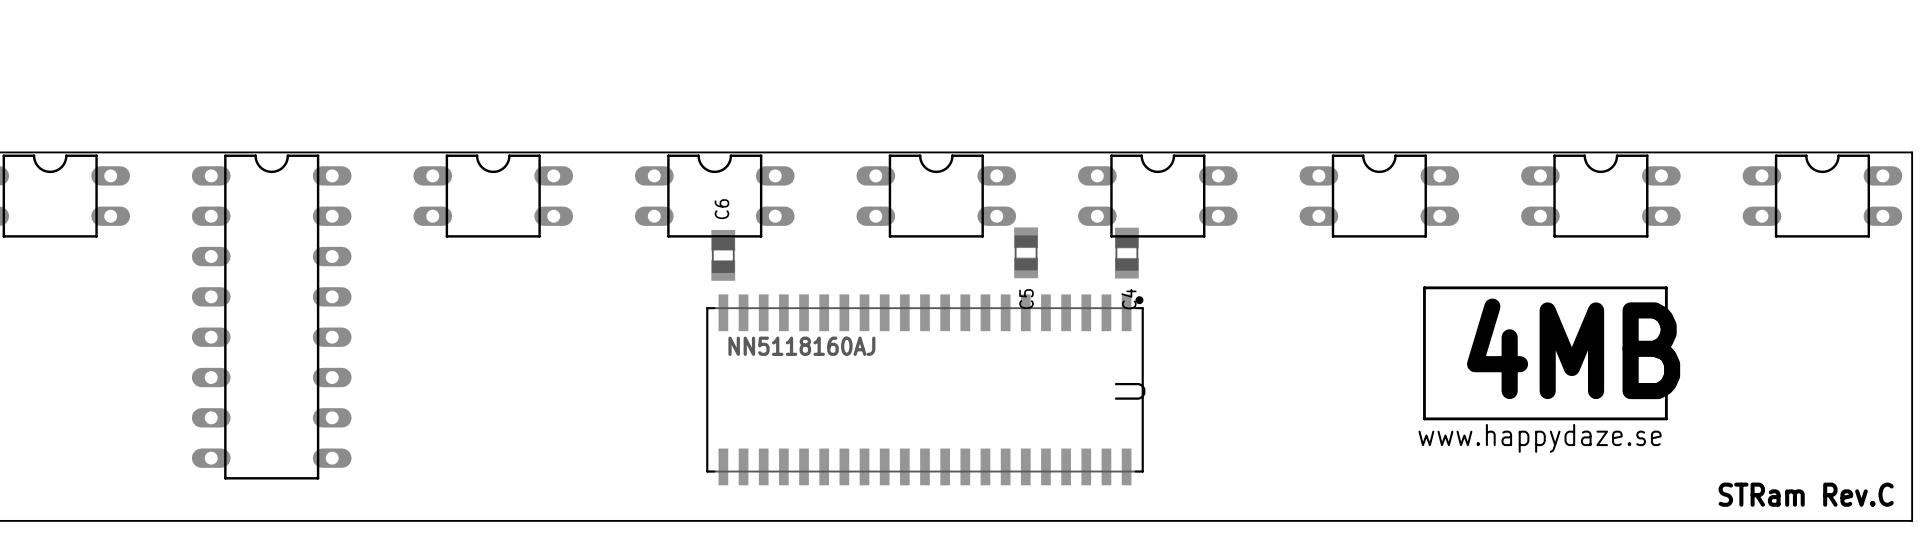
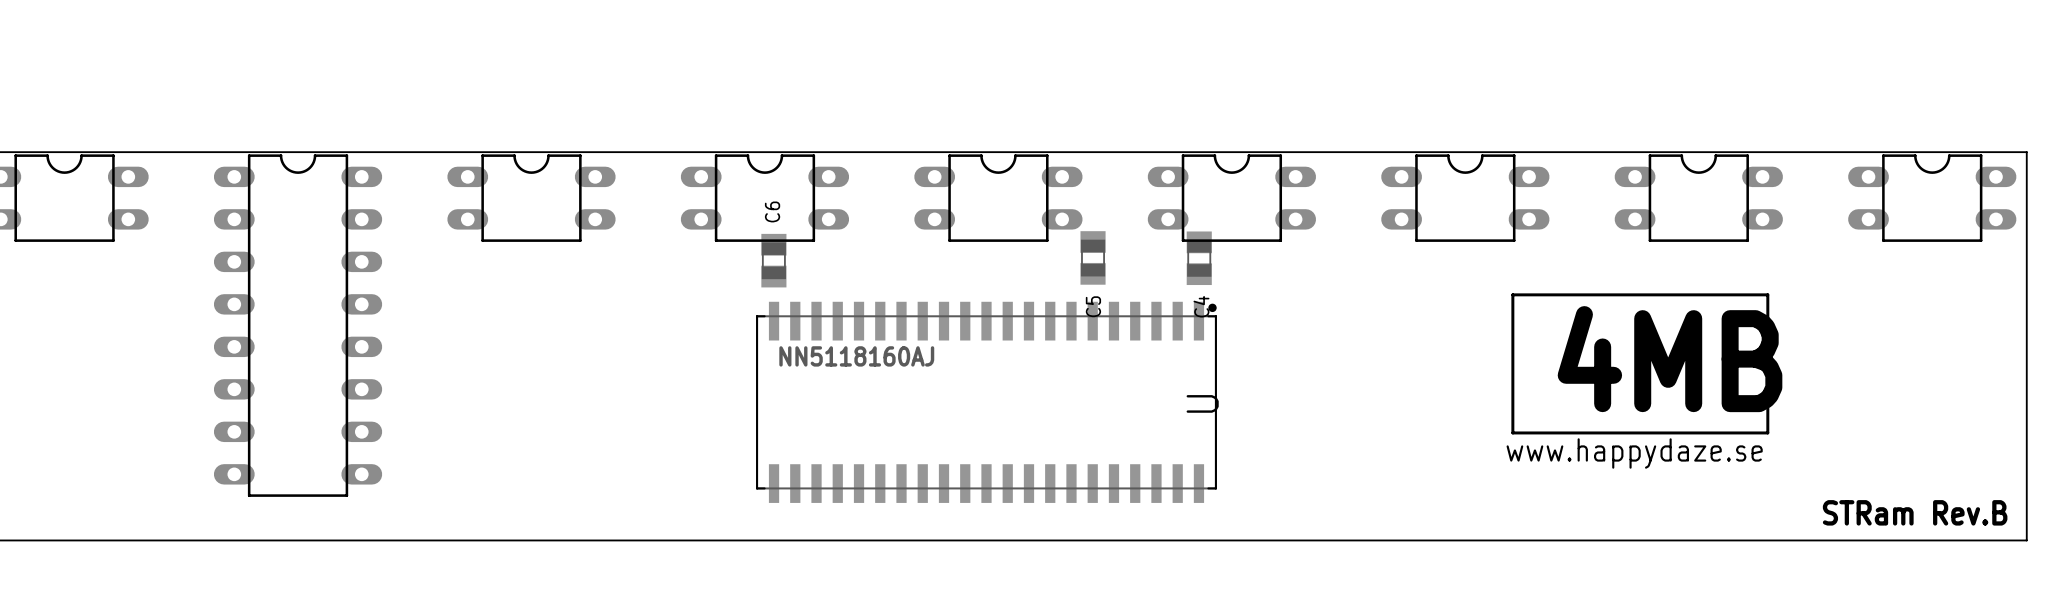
text: STRam Rev.C (1806, 494) -> STRam Rev.B (1915, 512)

